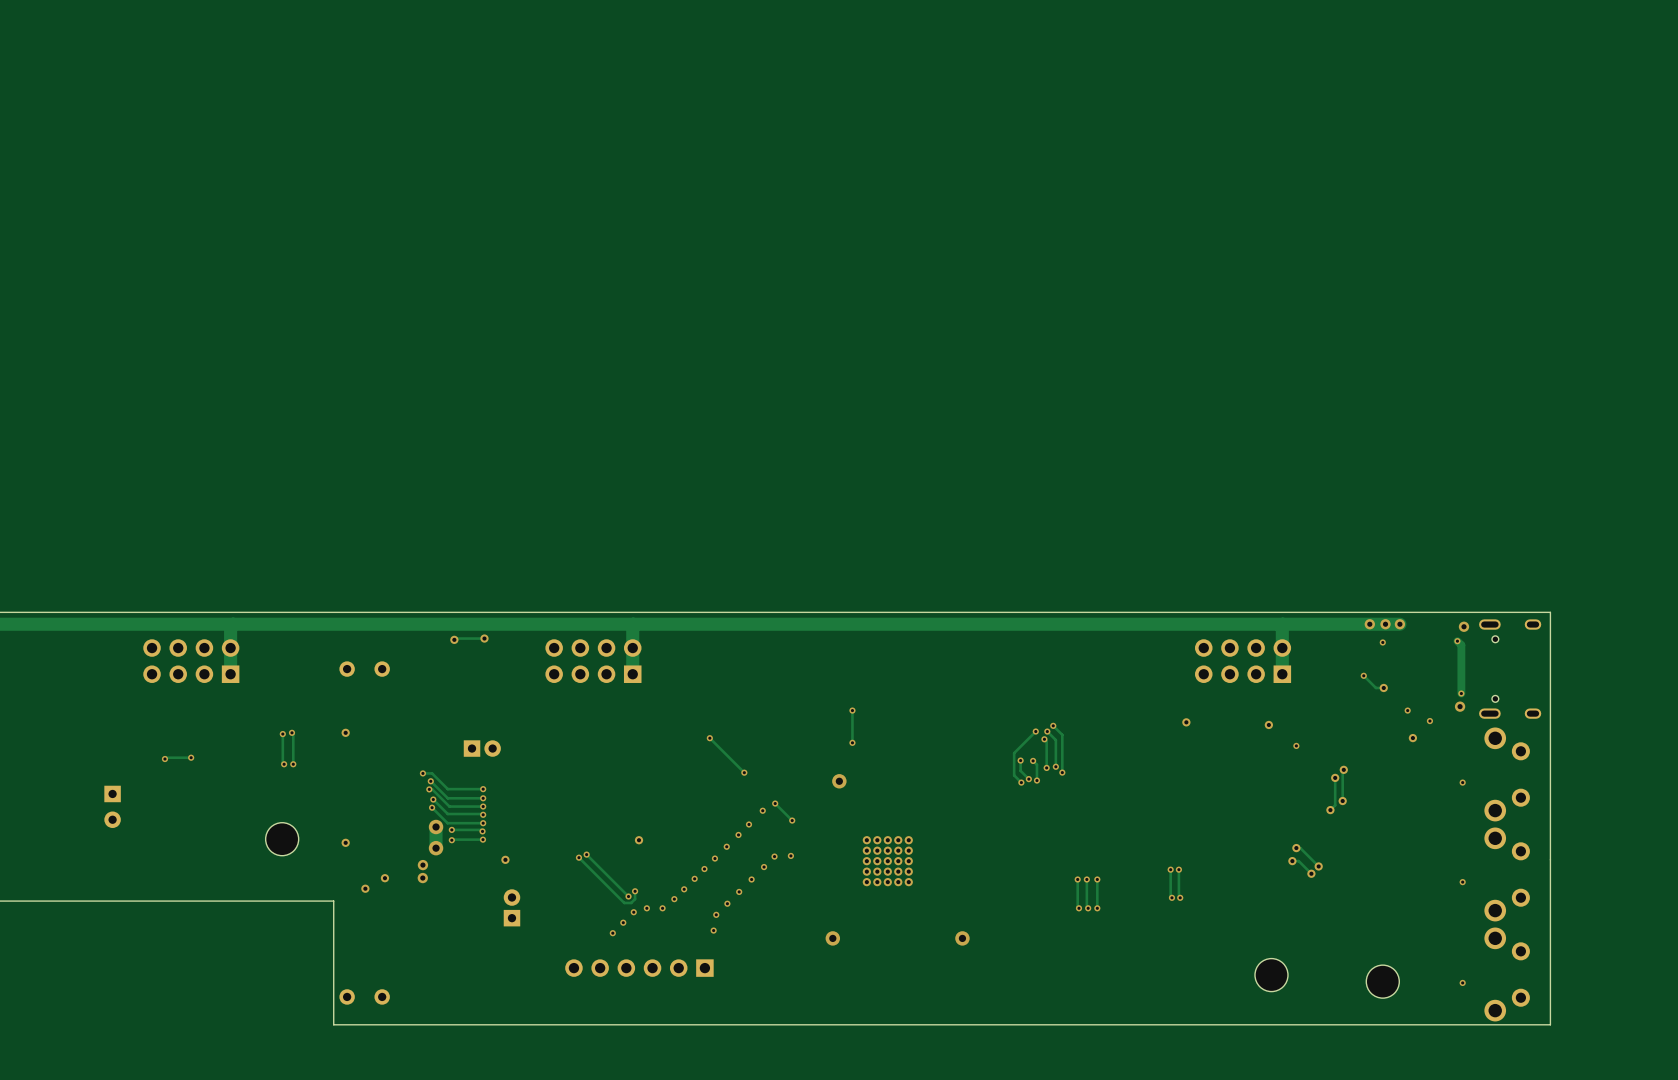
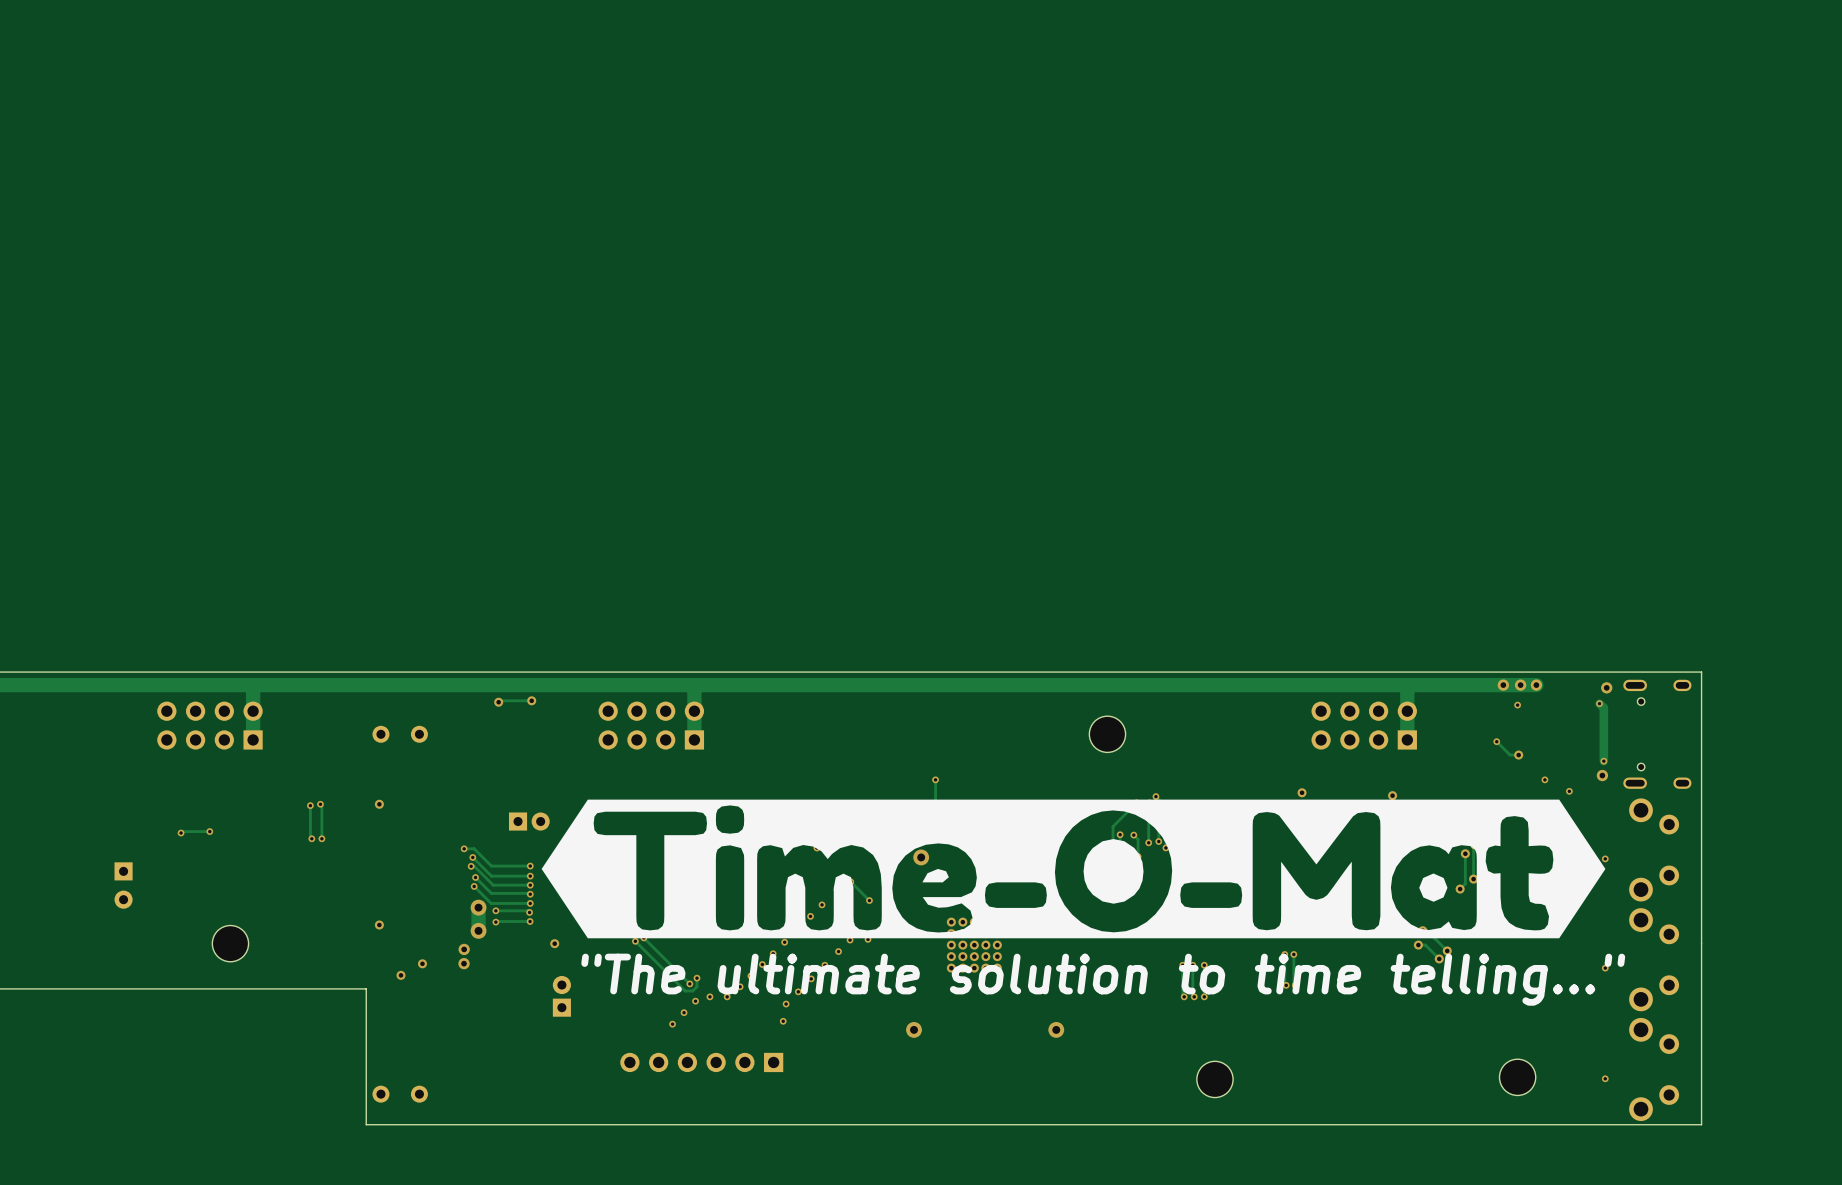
part: none -> (1107, 734)
drawing: none -> [541, 799, 1606, 939]
part position: (282, 839) -> (230, 943)
text: none -> "The ultimate solution to time telling..." (1103, 979)
part position: (1271, 975) -> (1214, 1079)

